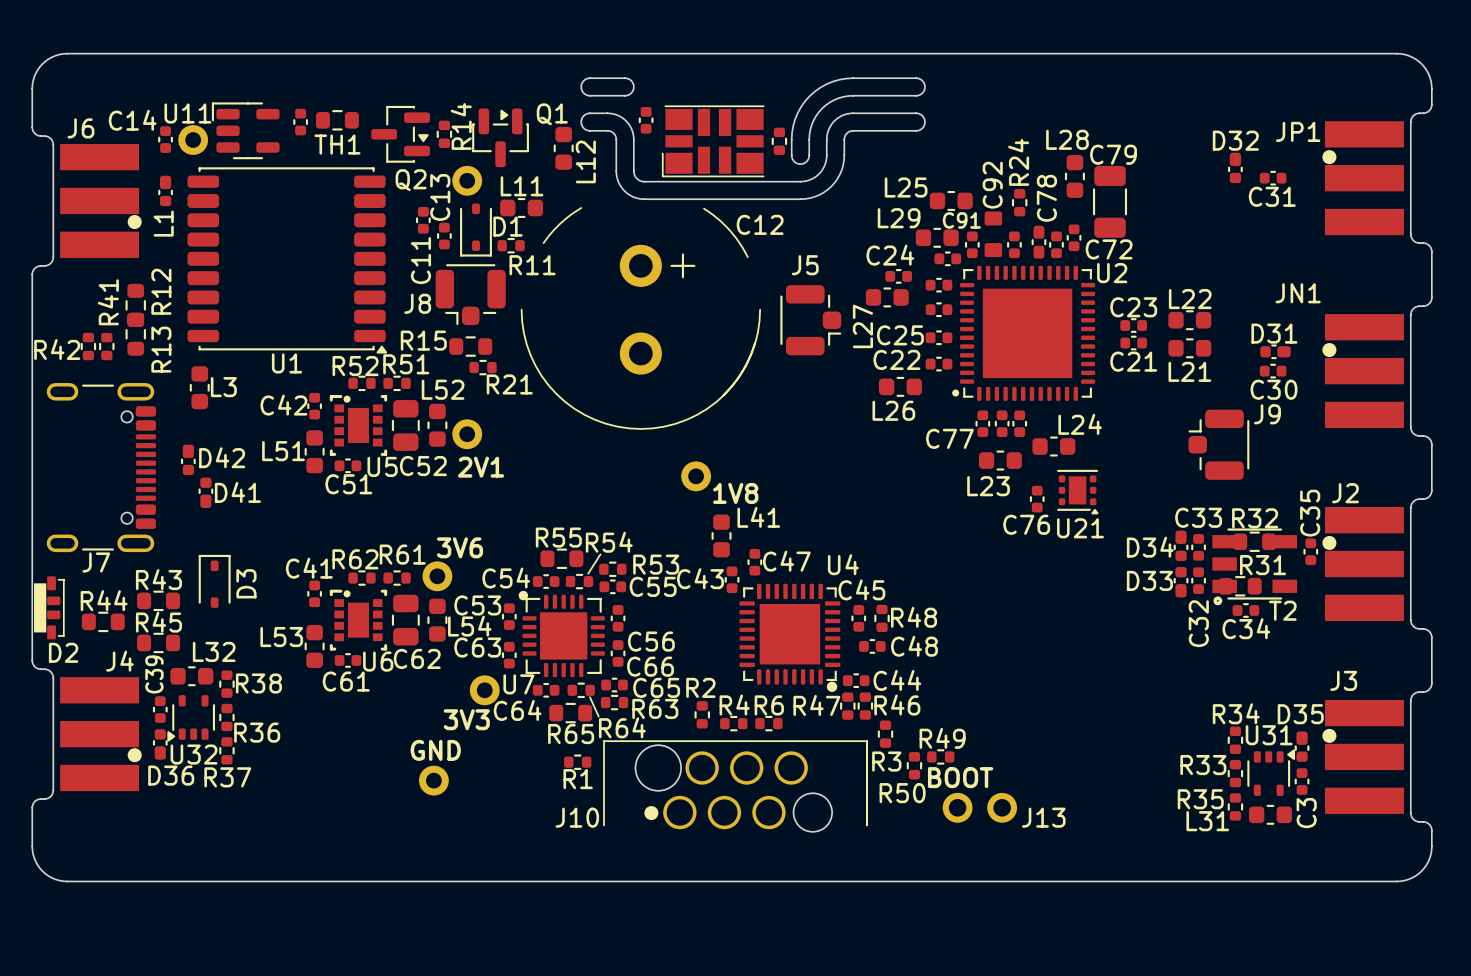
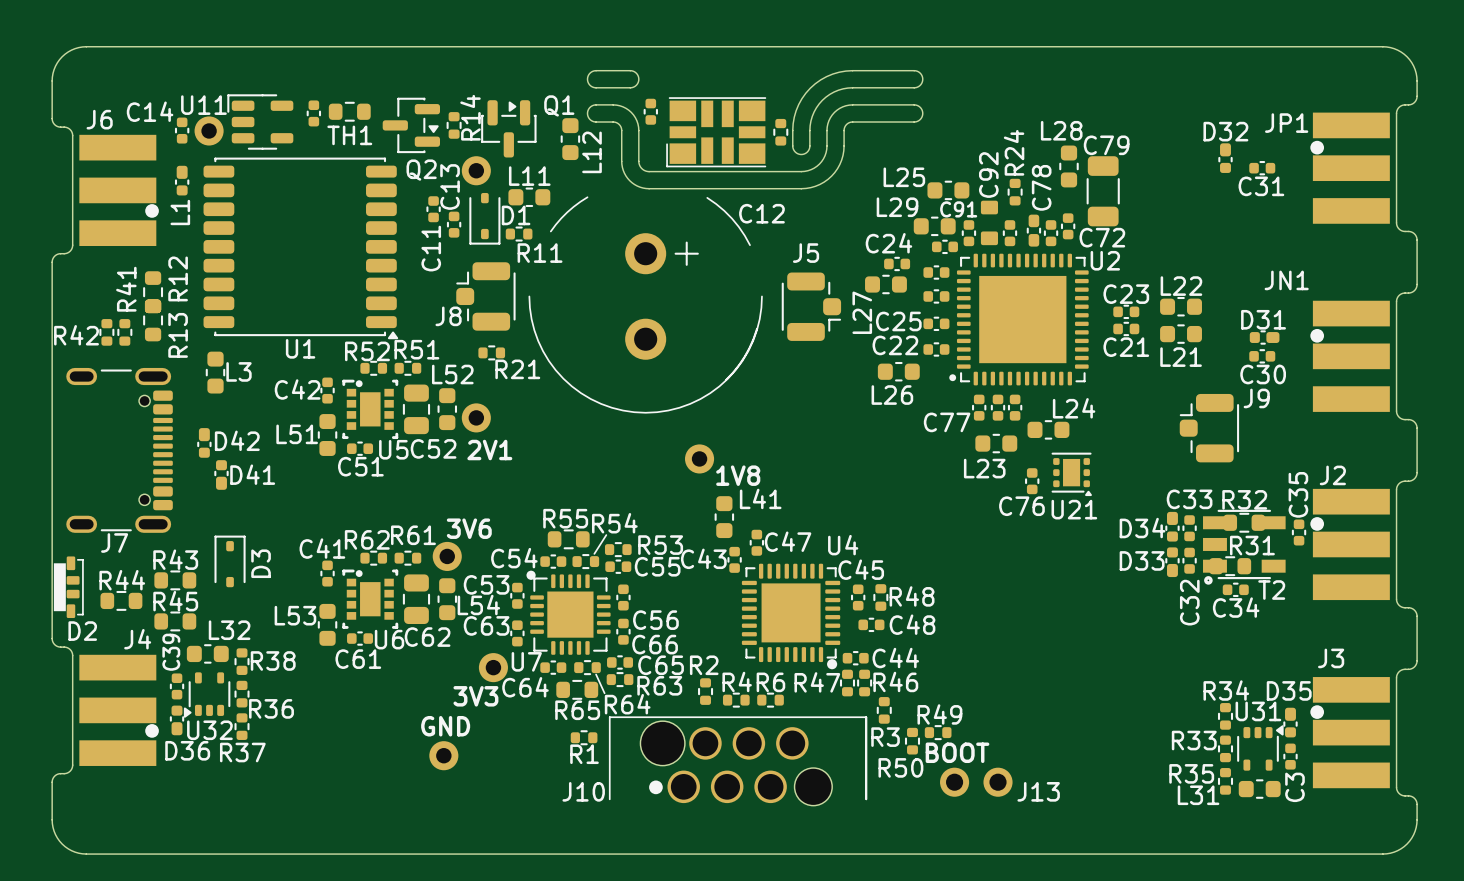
J8 rotation: 0° (470, 294) -> 90° clockwise (485, 296)
R15: (470, 346) -> none

